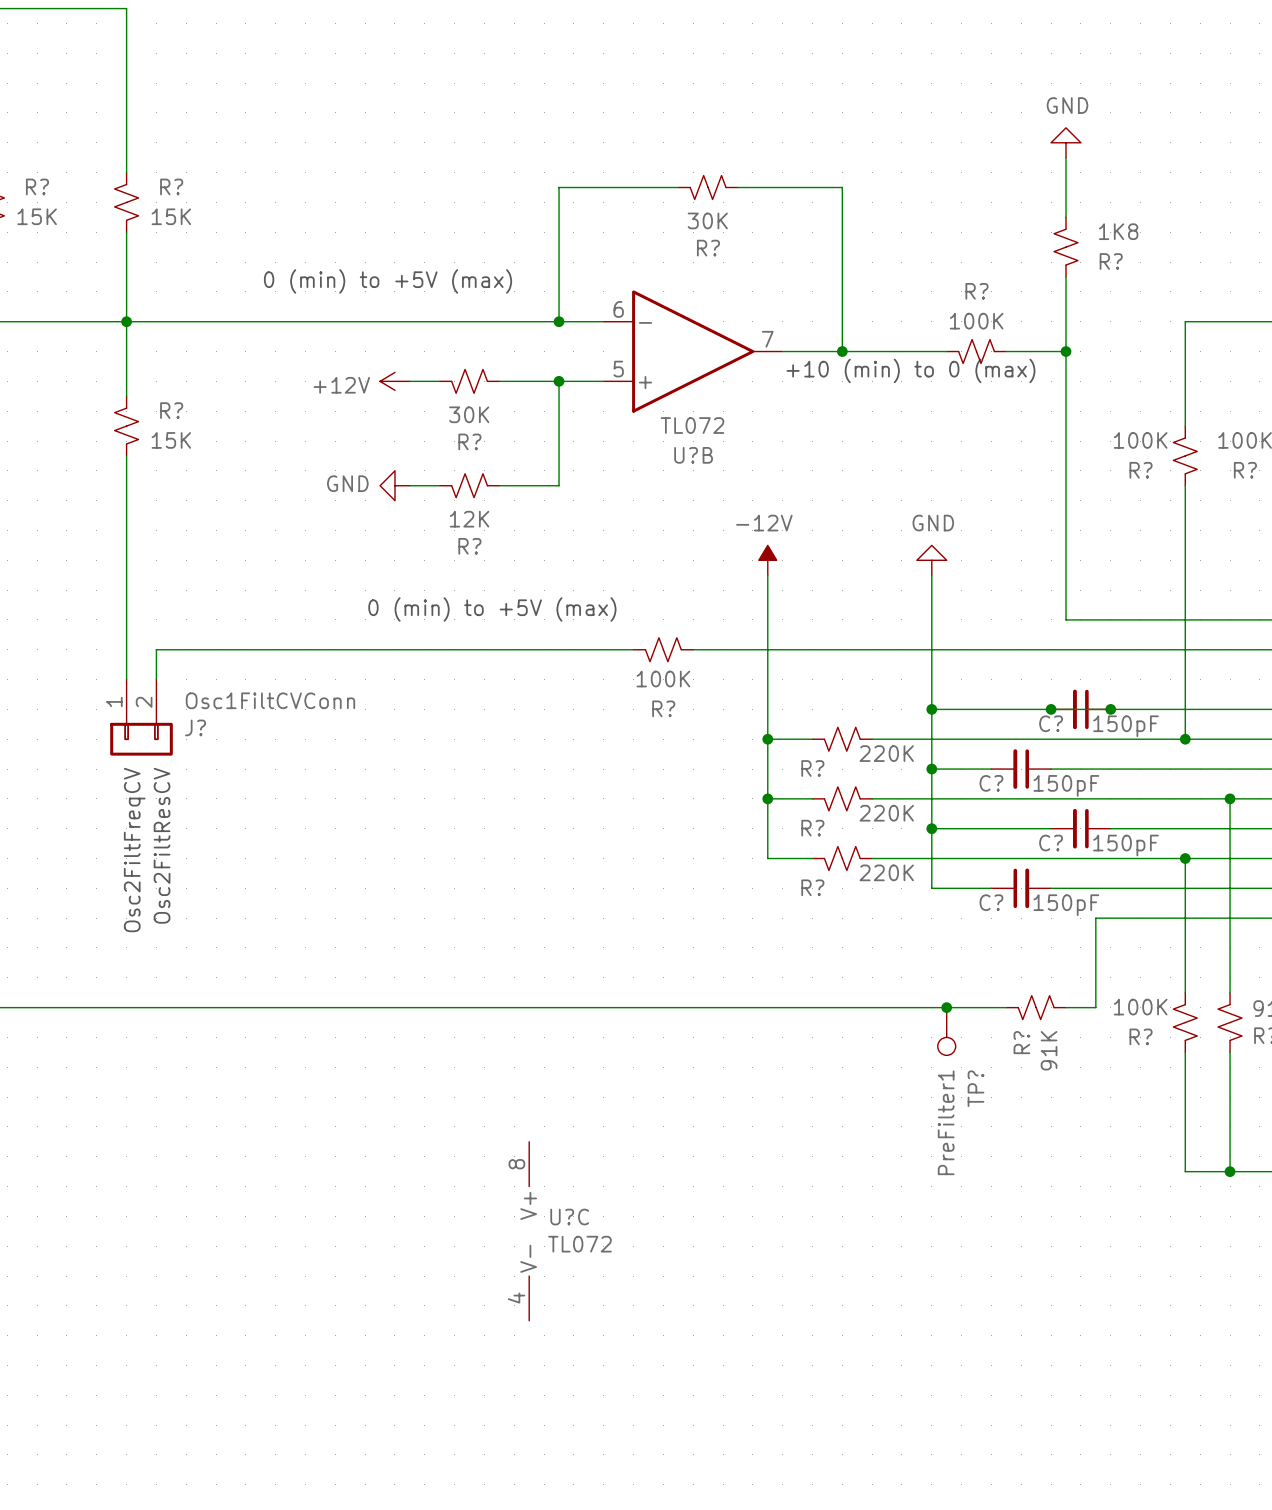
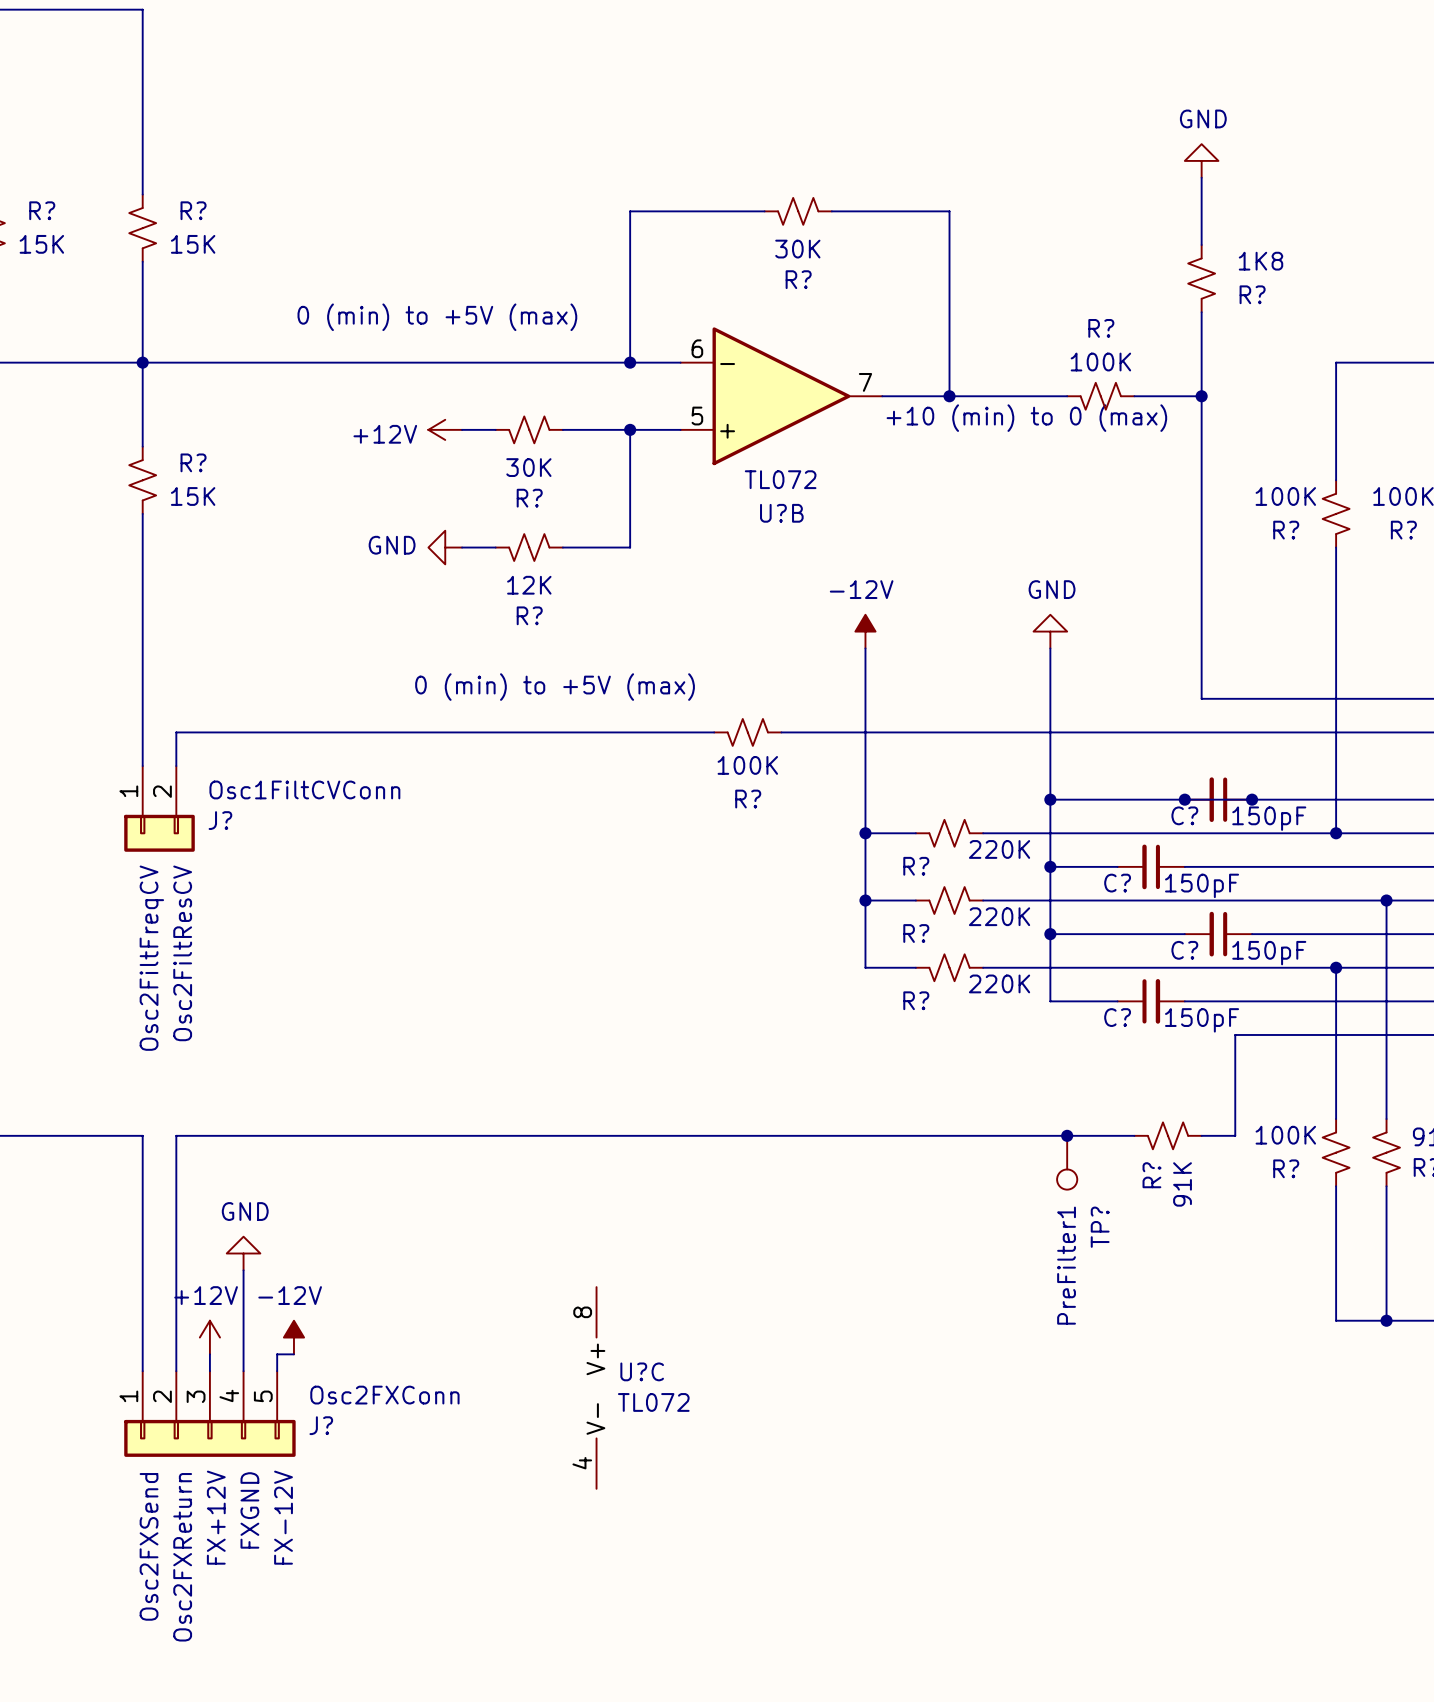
wire: (126, 1007) (156, 1007) -> (142, 1135) (142, 1371)
wire: none -> (176, 1135) (176, 1371)
power symbol: none -> GND (243, 1253)
wire: none -> (243, 1270) (243, 1371)
power symbol: none -> +12V (209, 1337)
power symbol: none -> -12V (293, 1337)
wire: none -> (209, 1354) (209, 1371)
wire: none -> (293, 1354) (277, 1354) (277, 1371)
J?: none -> Osc2FXConn (209, 1414)
text: none -> FXGND (249, 1510)
text: none -> FX+12V (216, 1517)
text: none -> FX-12V (283, 1517)
text: none -> Osc2FXSend (149, 1546)
text: none -> Osc2FXReturn (182, 1557)

